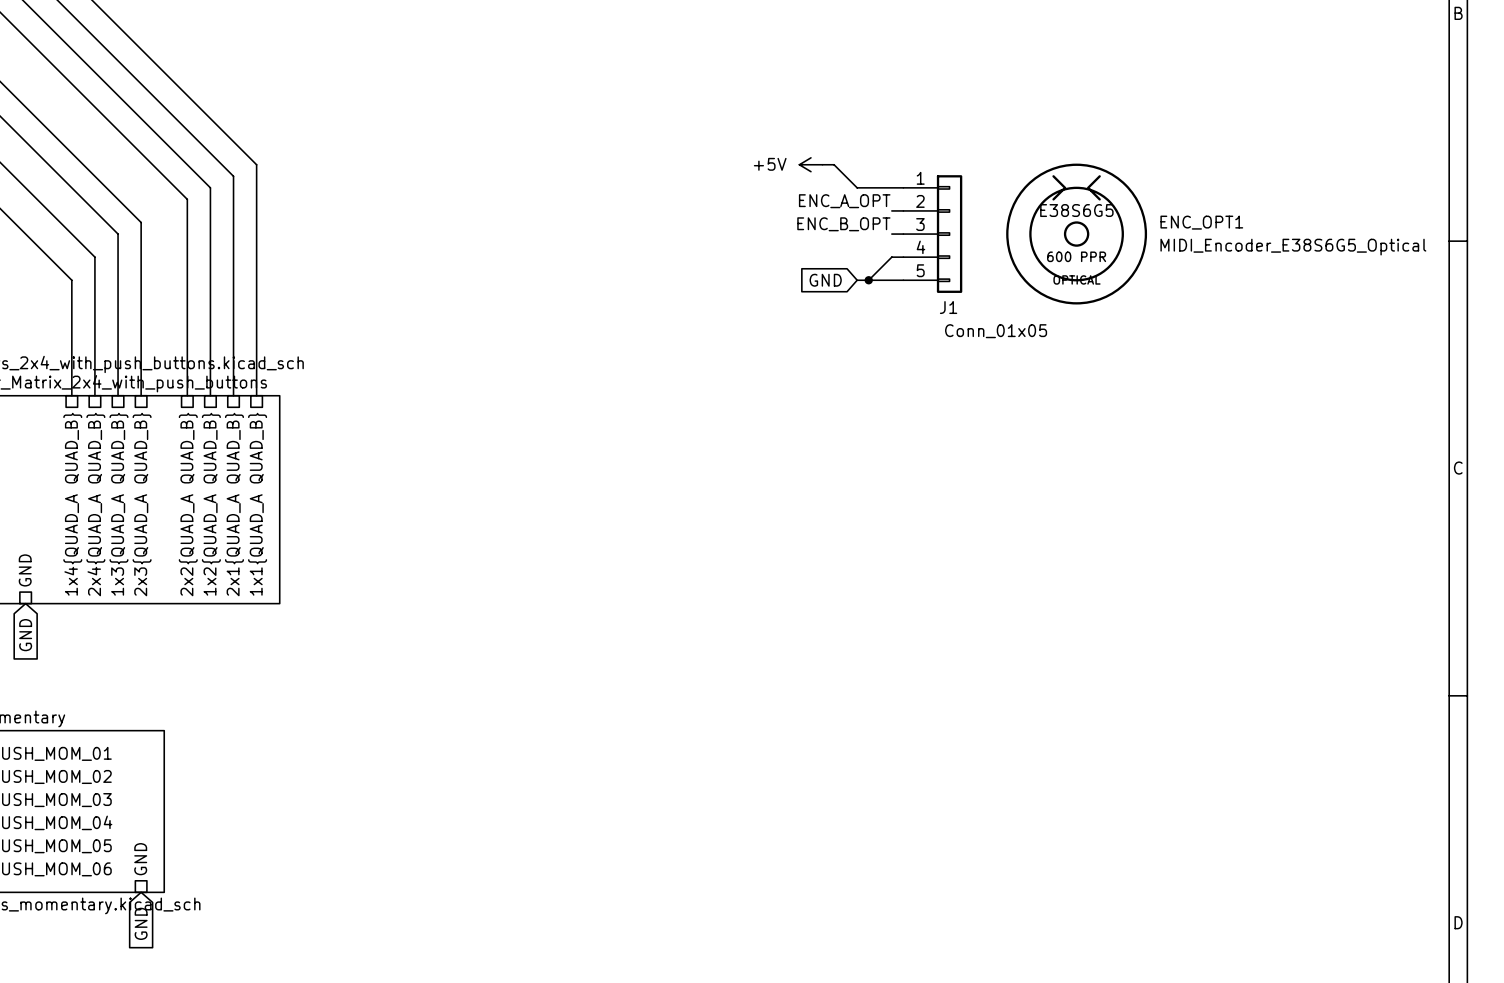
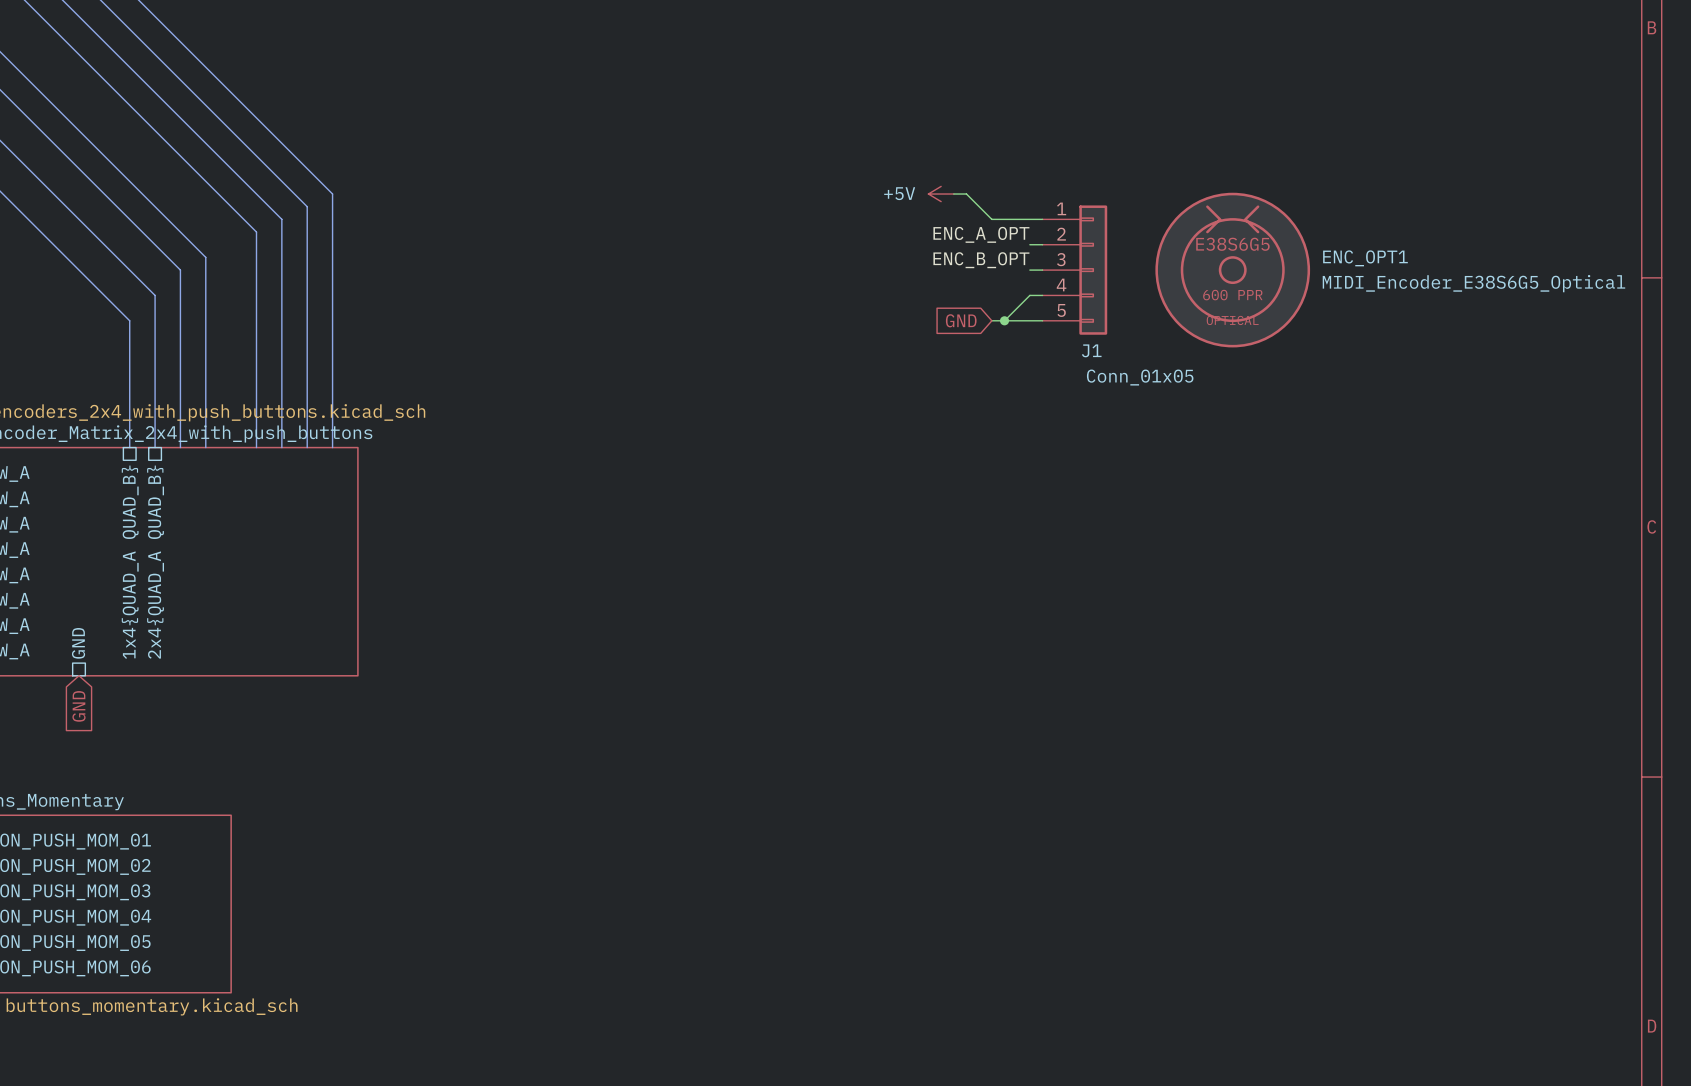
sheet pin: 1x3{QUAD_A QUAD_B} (118, 504) -> none
sheet pin: 2x3{QUAD_A QUAD_B} (142, 504) -> none
sheet pin: 2x2{QUAD_A QUAD_B} (188, 504) -> none
sheet pin: 1x2{QUAD_A QUAD_B} (211, 504) -> none
sheet pin: 2x1{QUAD_A QUAD_B} (234, 504) -> none
sheet pin: 1x1{QUAD_A QUAD_B} (257, 504) -> none
sheet pin: GND (140, 859) -> none
global label: GND (141, 923) -> none

